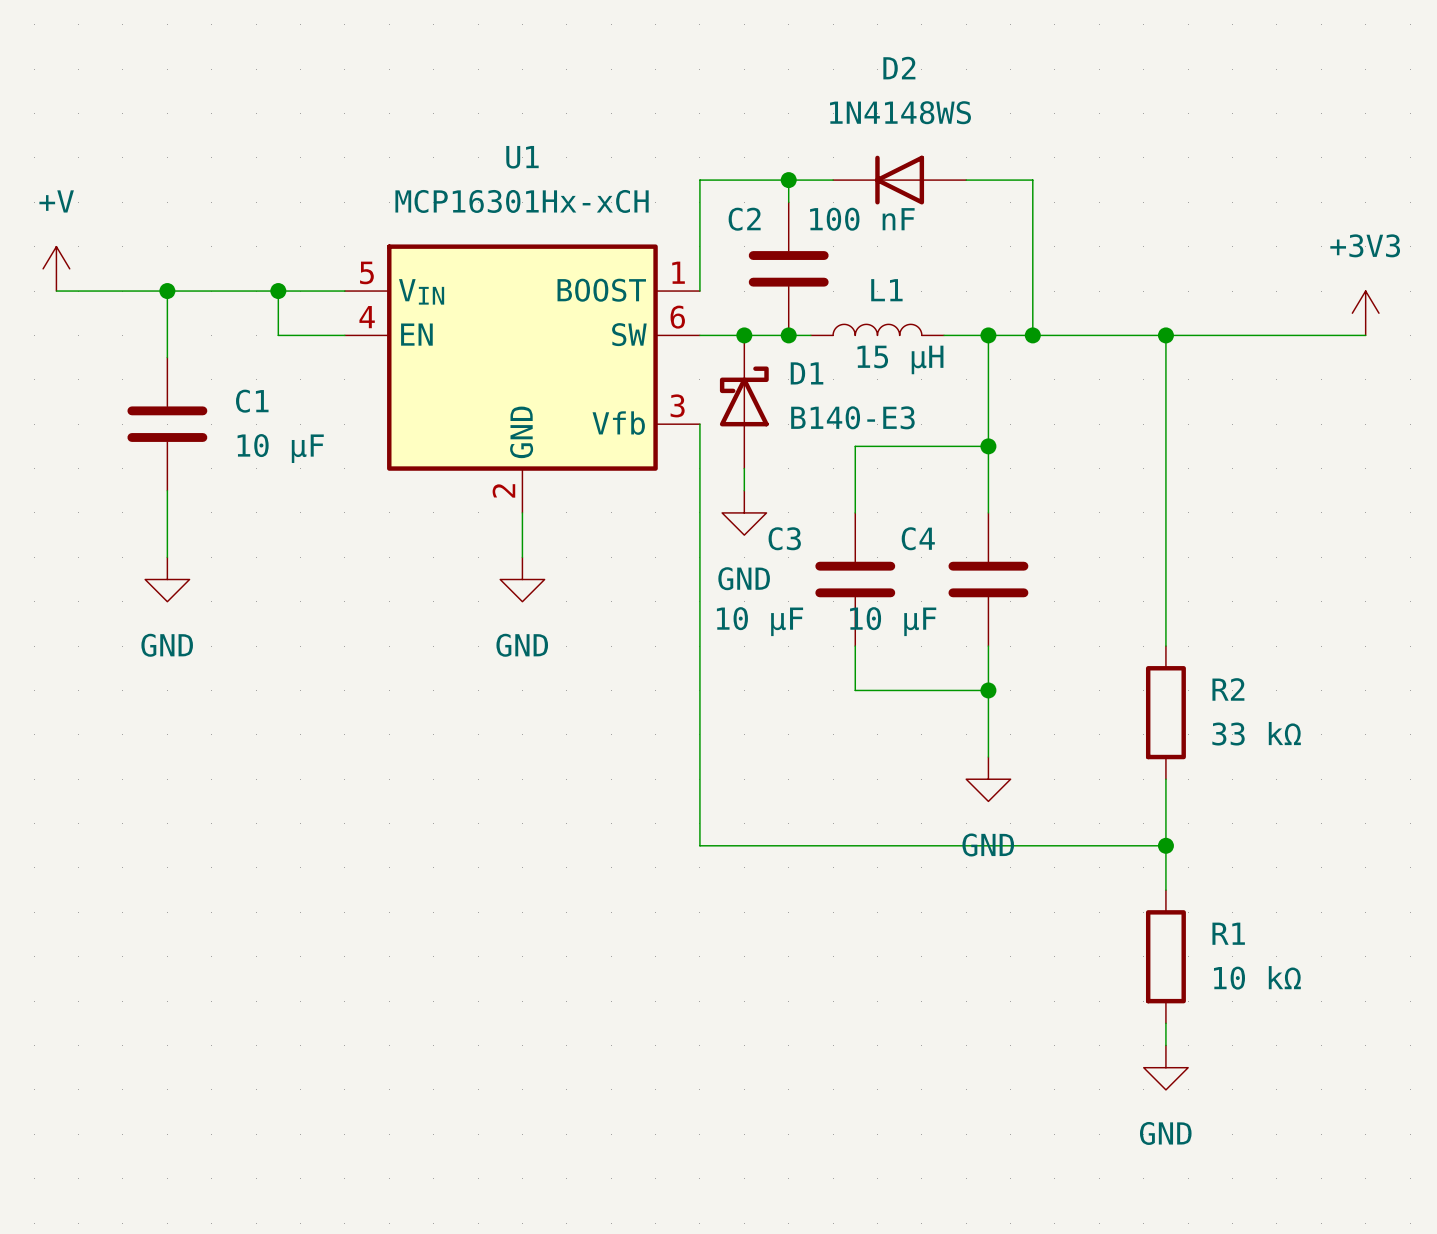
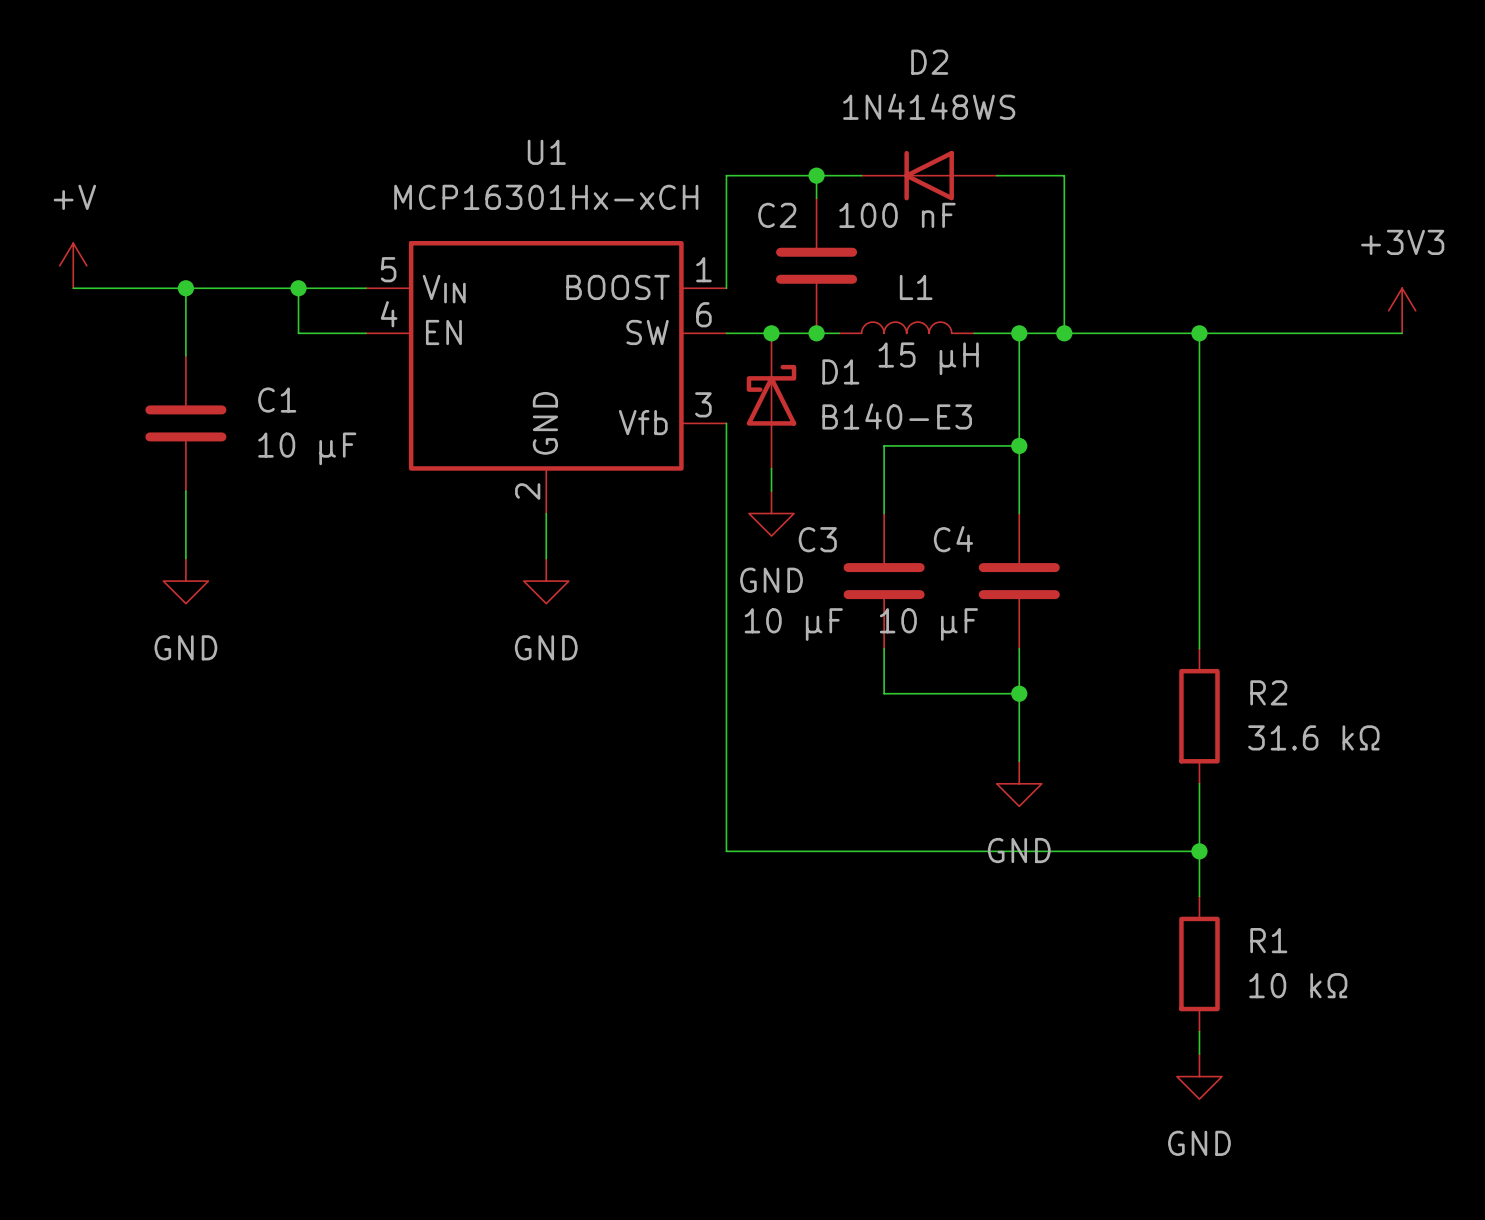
R2 value: 33 kΩ (1256, 733) -> 31.6 kΩ (1313, 737)

